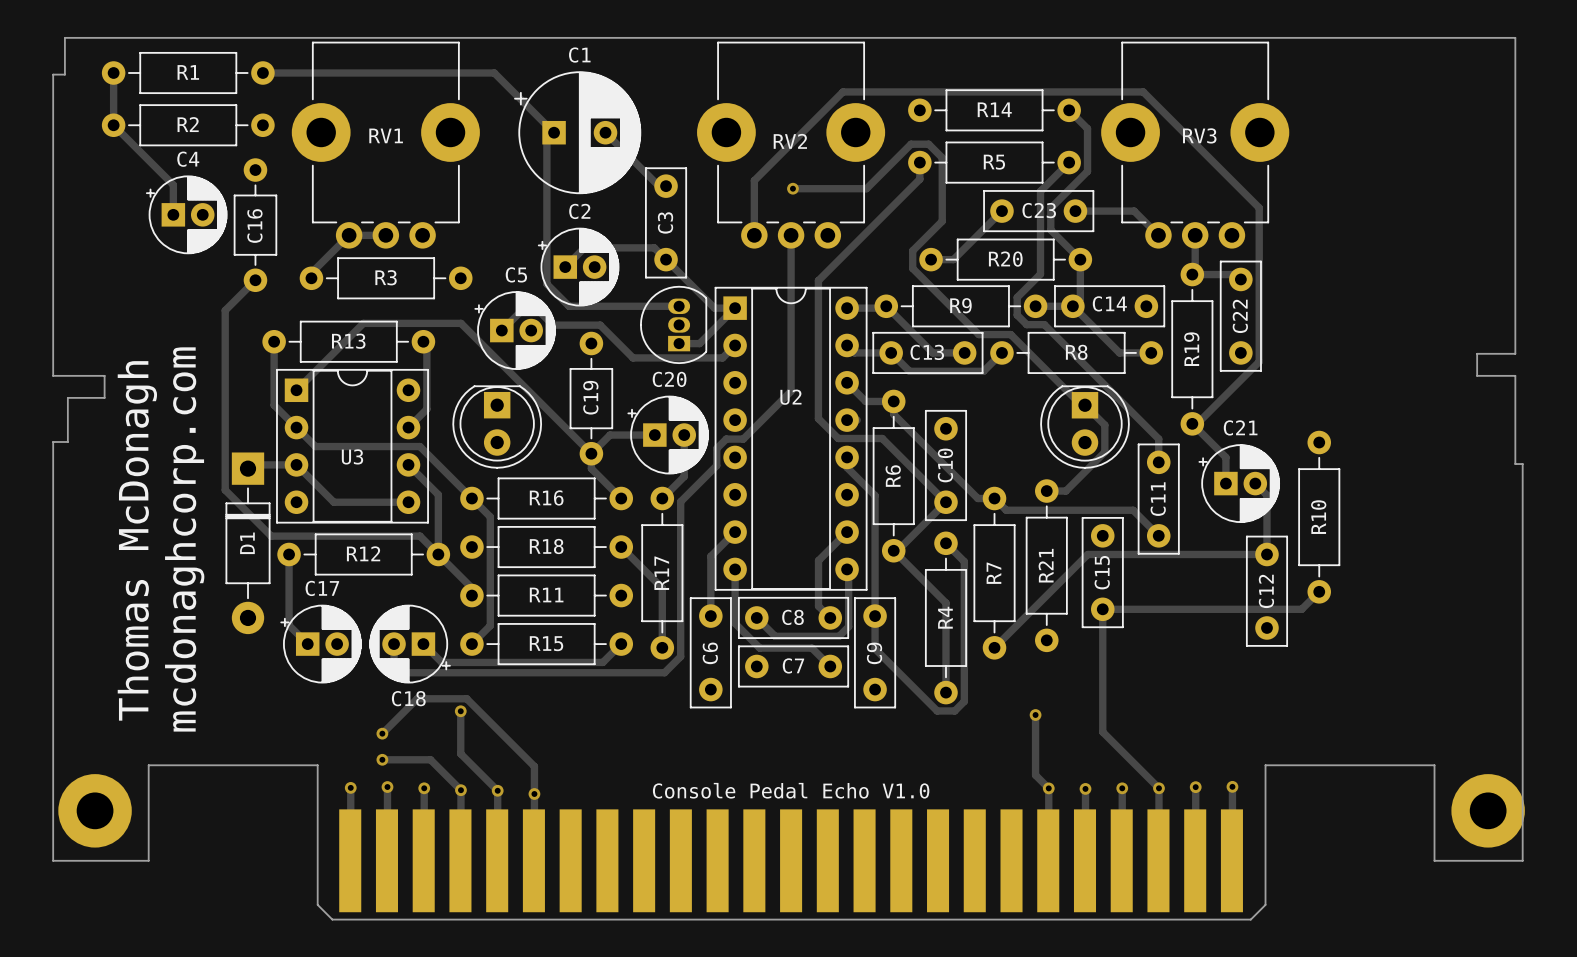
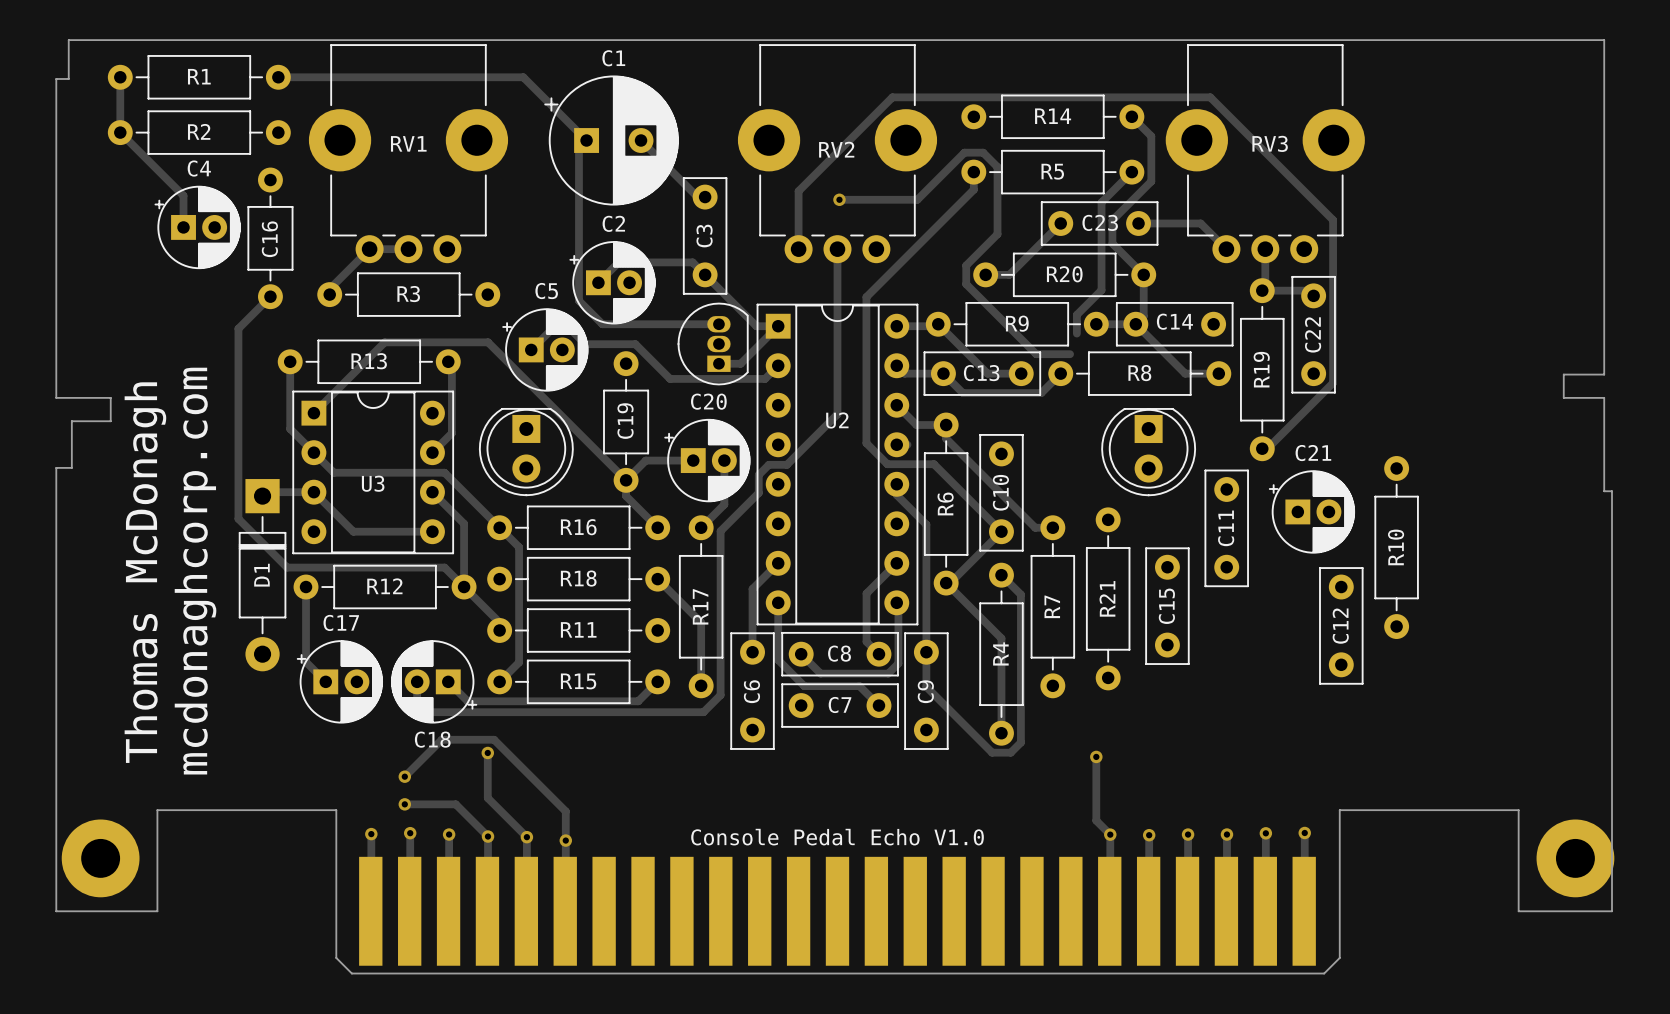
track: (1017, 315) (1026, 324) (1044, 324) (1158, 439) (1158, 462) -> none
track: (1010, 334) (1081, 405) (1084, 405) (1104, 425) (1104, 452) (1065, 491) (1046, 491) -> none
track: (1192, 423) (1225, 457) (1225, 483) -> none
track: (1255, 483) (1266, 495) (1266, 554) (1087, 554) (994, 647) -> none
track: (994, 498) (1006, 510) (1133, 510) (1158, 535) -> none
track: (1319, 591) (1301, 609) (1102, 609) (1102, 732) (1158, 788) -> none

